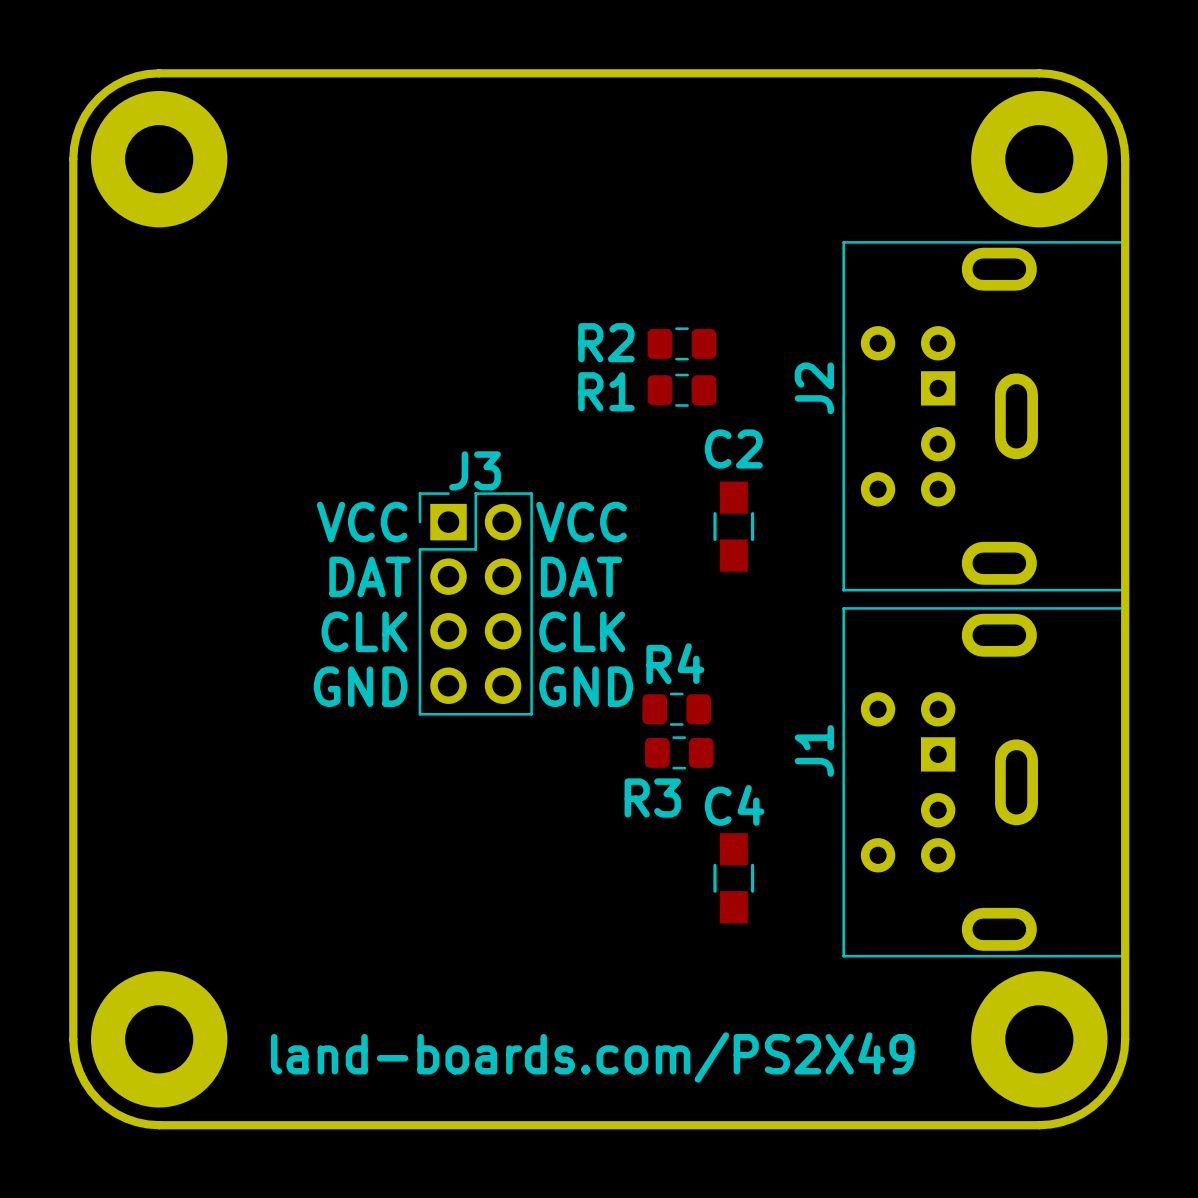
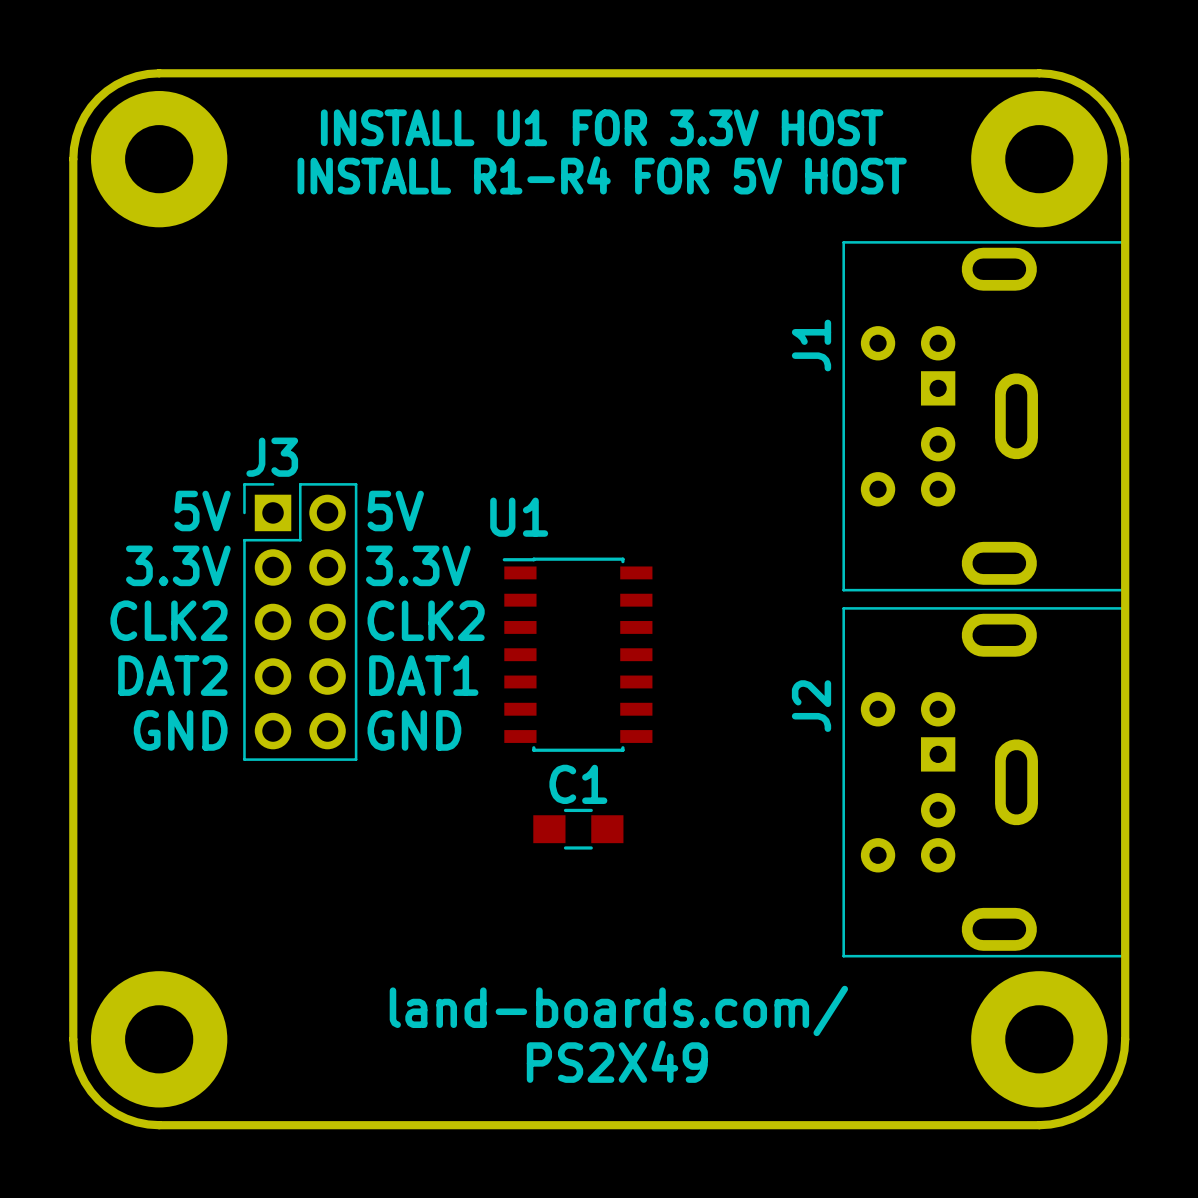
text: none -> INSTALL U1 FOR 3.3V HOST (602, 127)
text: none -> INSTALL R1-R4 FOR 5V HOST (602, 175)
R2: (681, 343) -> none
J2 name: J2 (814, 388) -> J1 (811, 345)
R1: (681, 390) -> none
J3 footprint: [418, 492, 533, 716] -> [243, 483, 358, 761]
text: none -> 5V (202, 510)
text: none -> 5V (395, 510)
text: VCC (362, 522) -> none
text: VCC (581, 522) -> none
C2: (733, 526) -> none
text: none -> 3.3V (178, 565)
text: none -> 3.3V (418, 565)
text: DAT (369, 576) -> none
text: DAT (581, 576) -> none
text: none -> CLK2 (169, 620)
text: CLK (364, 631) -> CLK2 (426, 620)
text: CLK (582, 631) -> none
U1: none -> (577, 654)
text: none -> DAT2 (172, 675)
text: none -> DAT1 (423, 675)
text position: GND (360, 686) -> GND (414, 730)
text: GND (586, 686) -> none
R4: (676, 709) -> none
text: none -> GND (180, 730)
J1 name: J1 (814, 750) -> J2 (811, 706)
R3: (679, 752) -> none
C1: none -> (578, 829)
C4: (733, 878) -> none
text: land-boards.com/PS2X49 (592, 1057) -> land-boards.com/ (618, 1010)
text: none -> PS2X49 (617, 1061)

